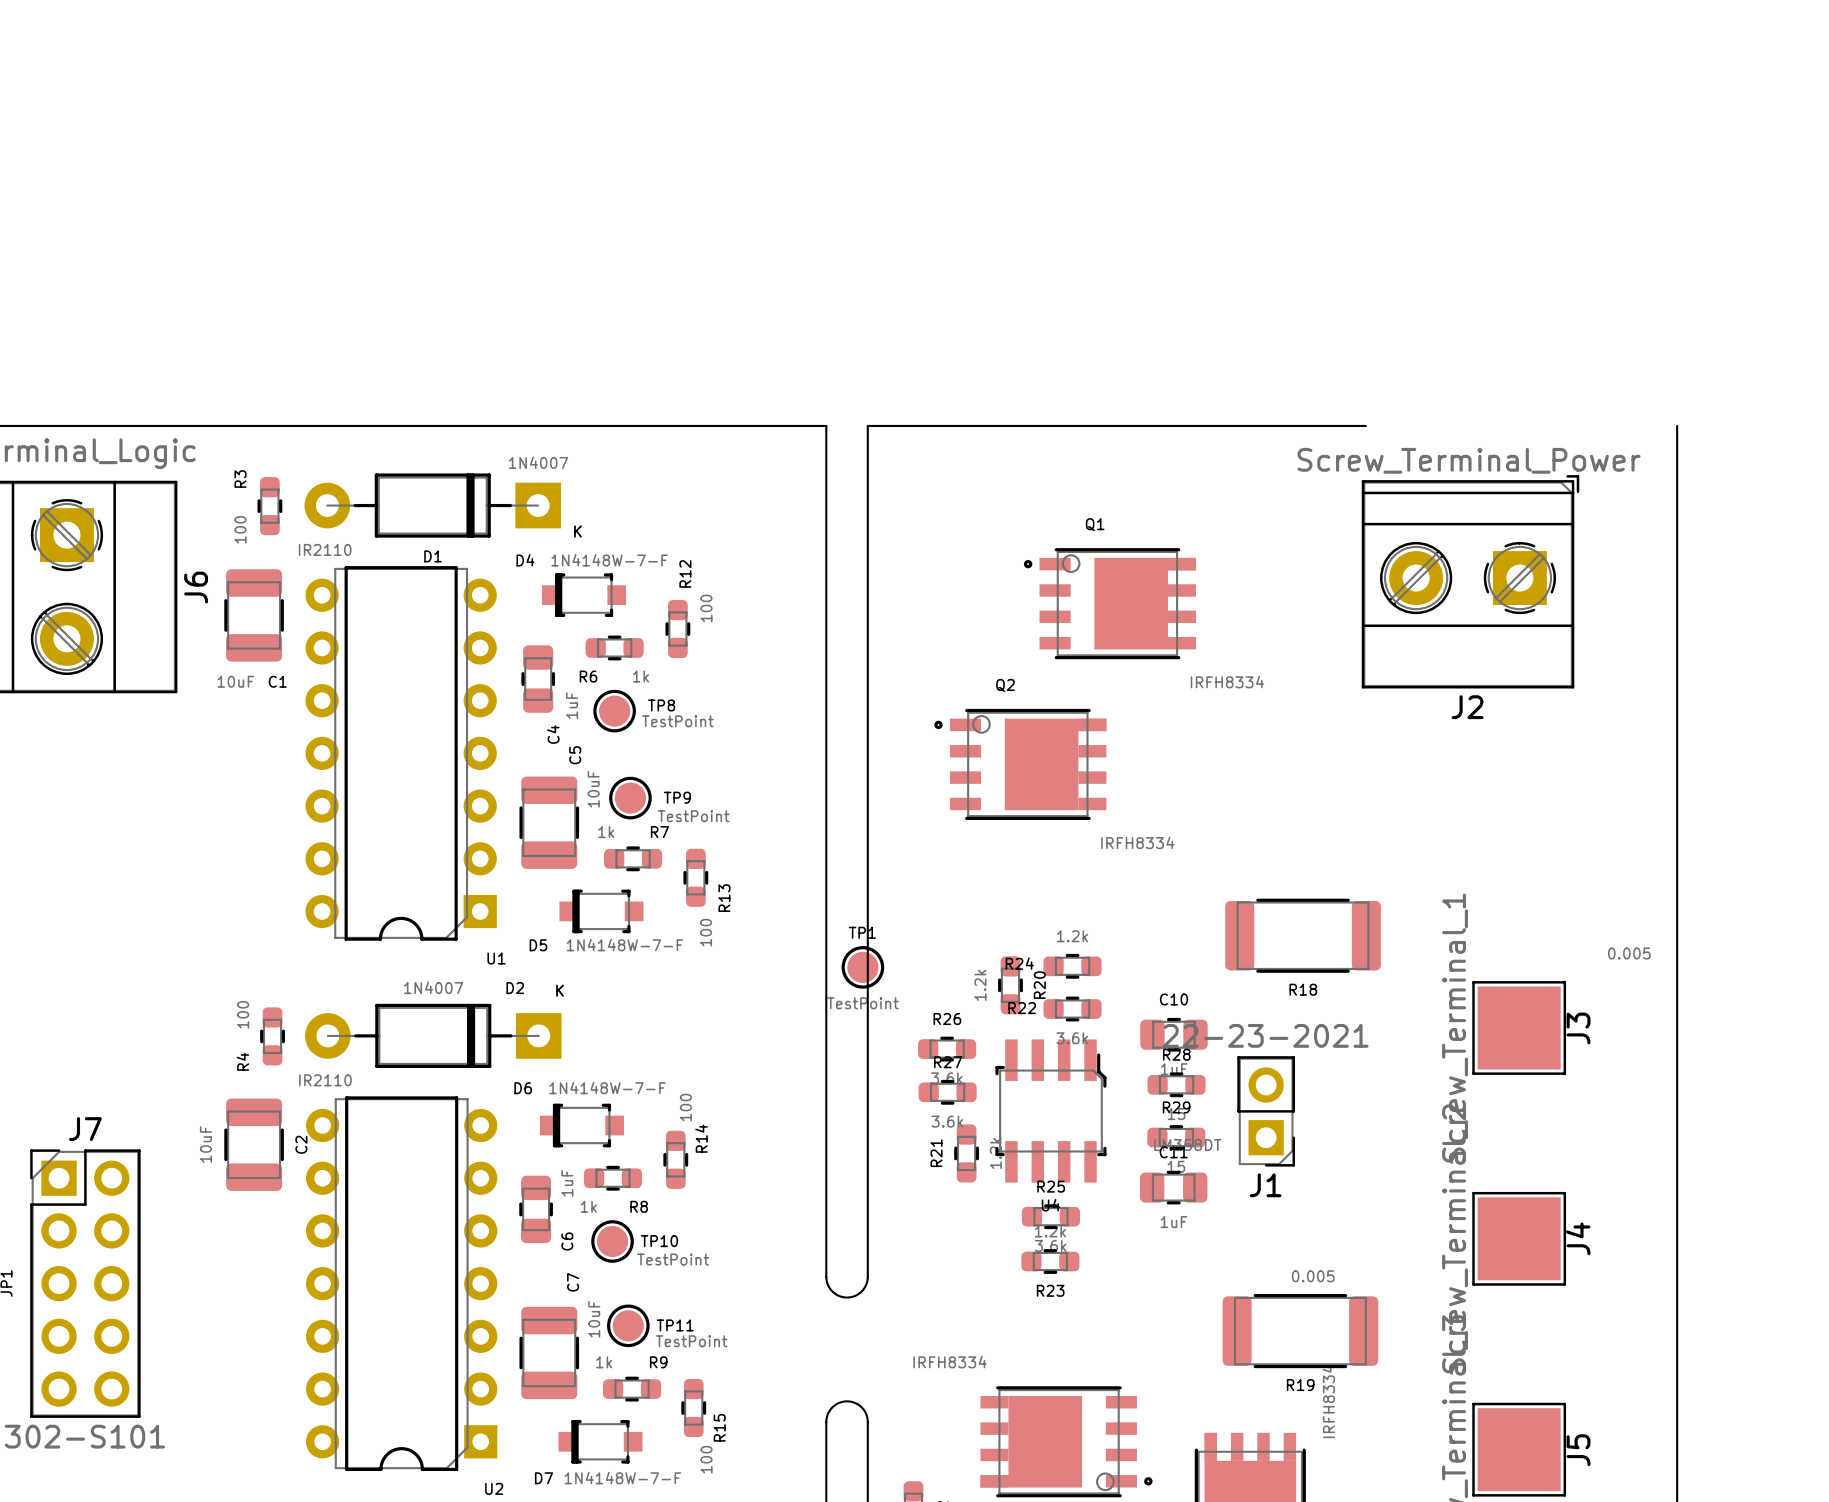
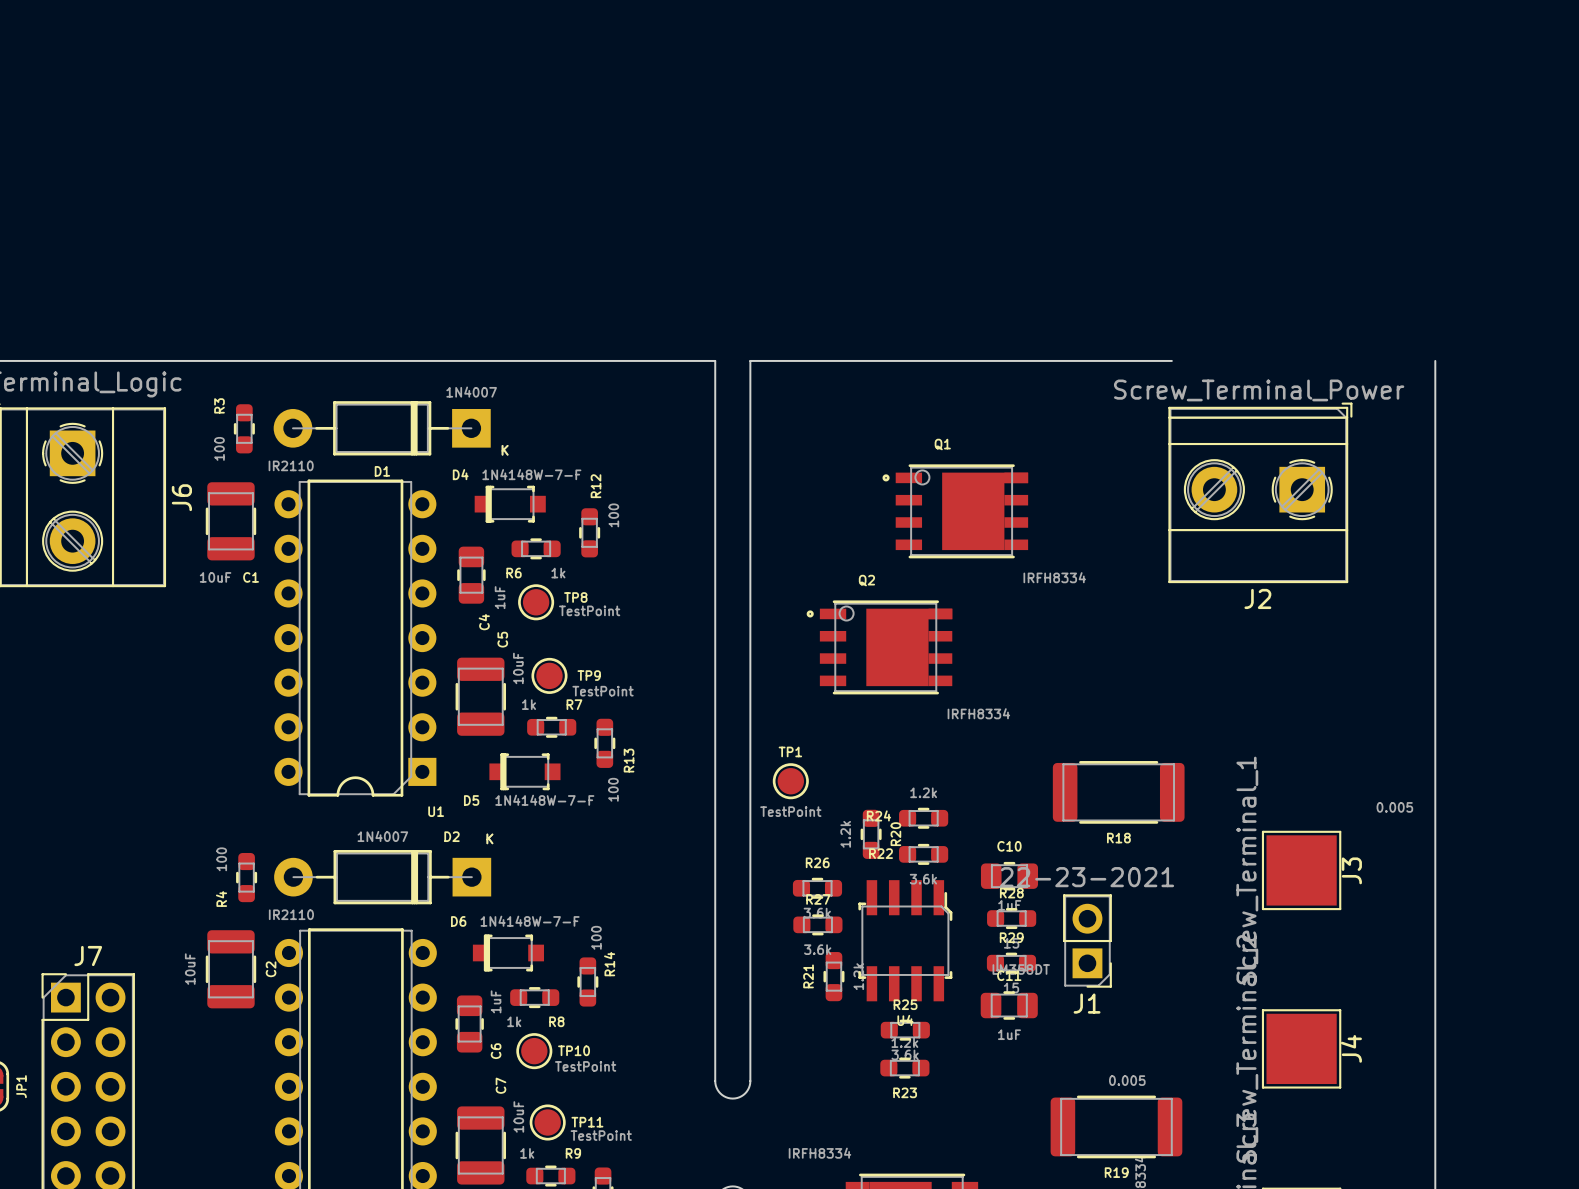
TP1 position: (862, 967) -> (790, 781)

